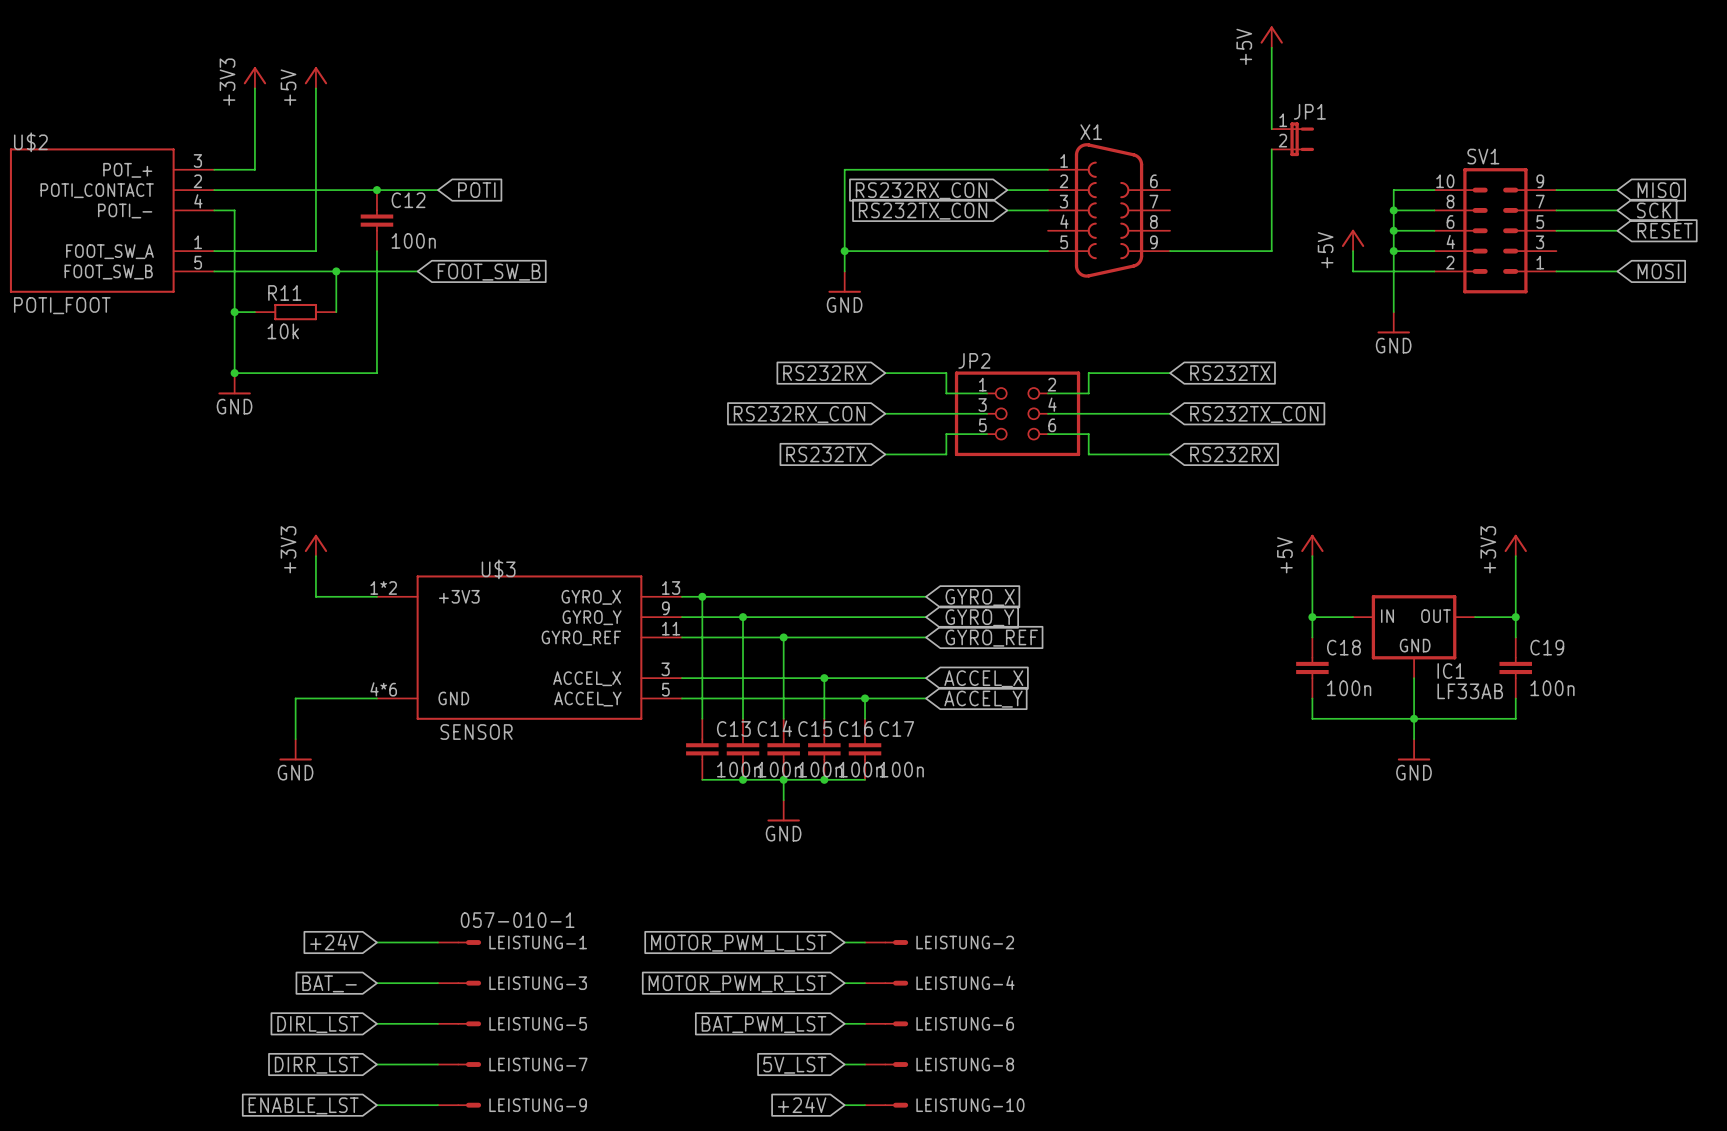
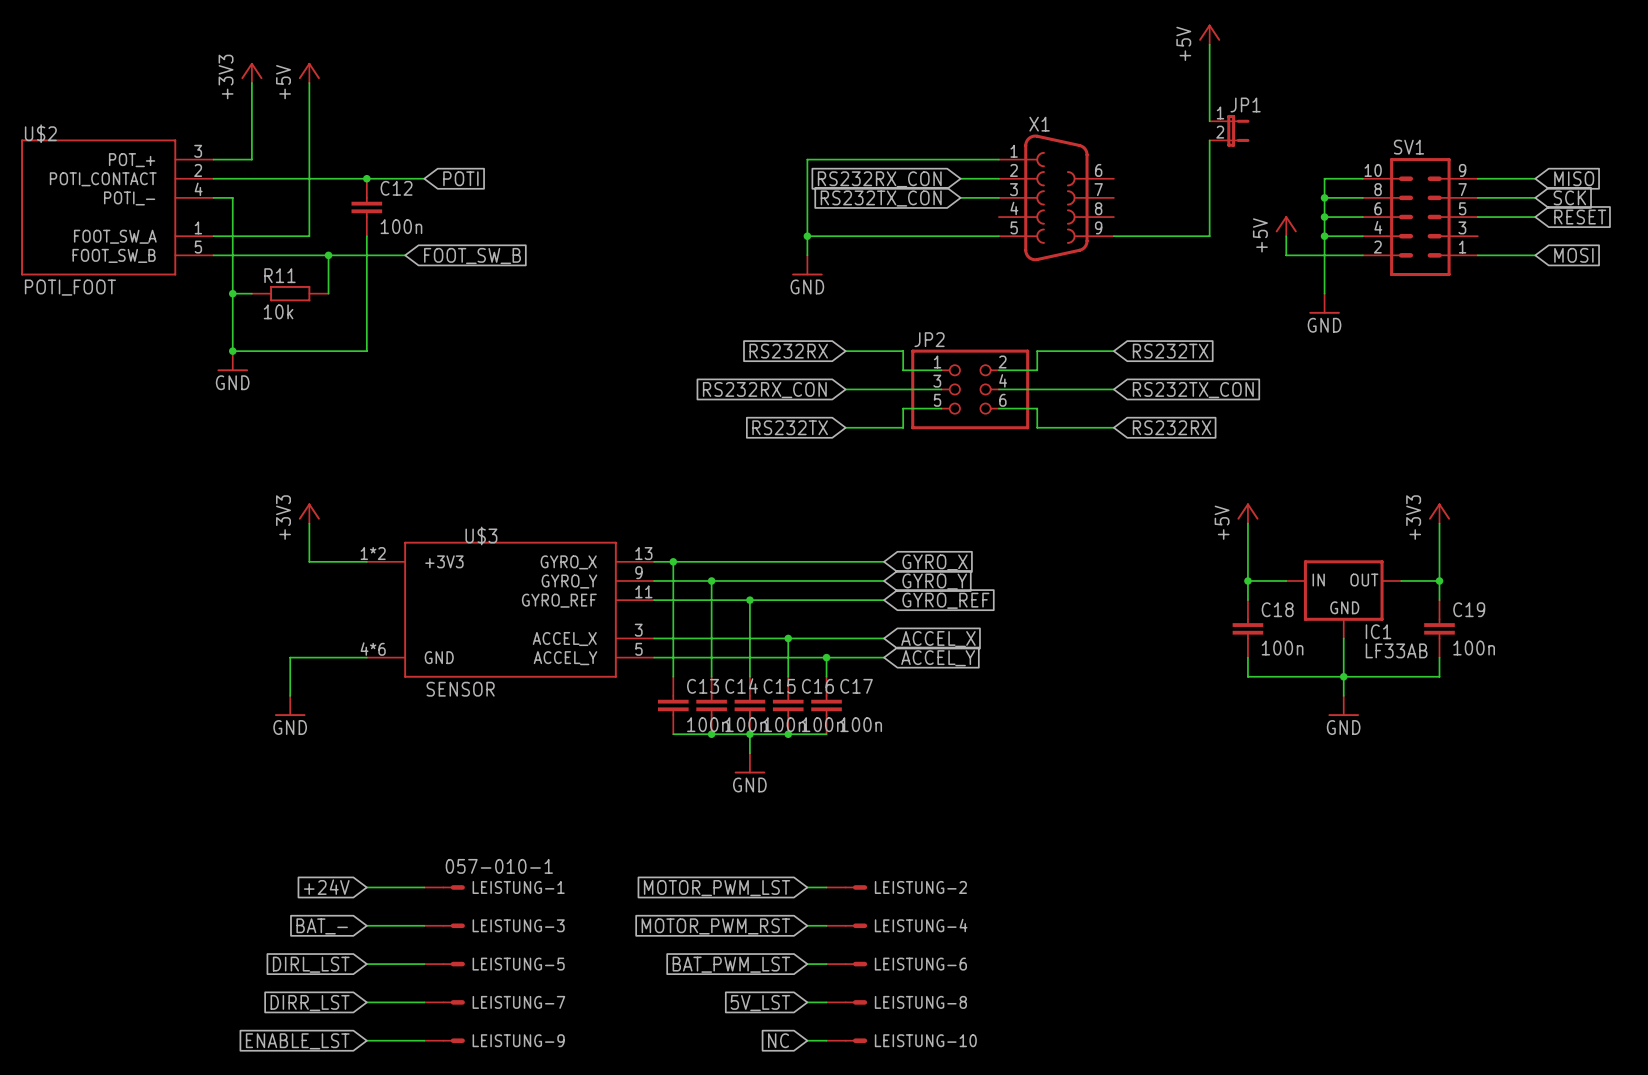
global label: MOTOR_PWM_L_LST (738, 943) -> MOTOR_PWM_LST (717, 888)
global label: MOTOR_PWM_R_LST (737, 983) -> MOTOR_PWM_RST (715, 926)
global label: +24V (802, 1104) -> NC (778, 1040)

